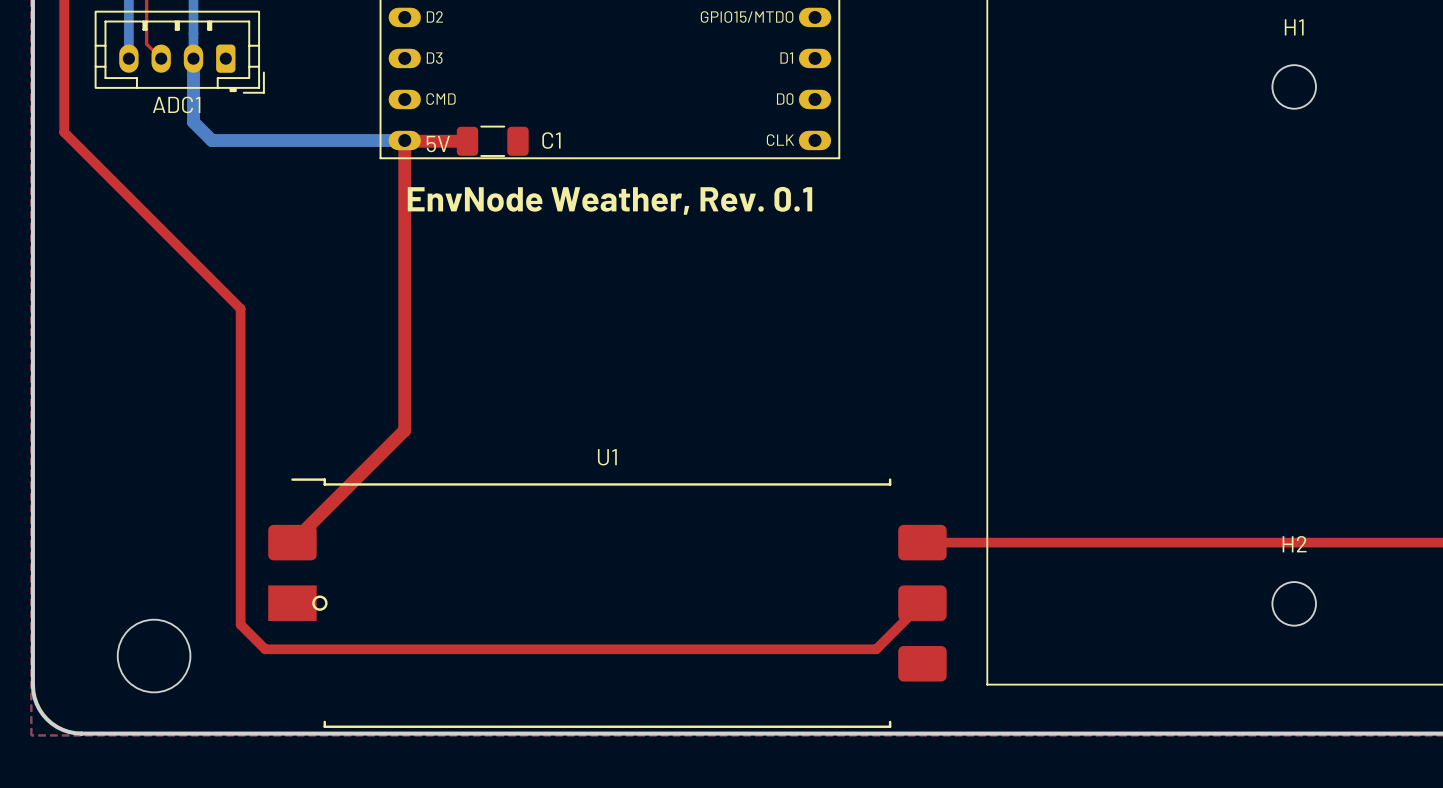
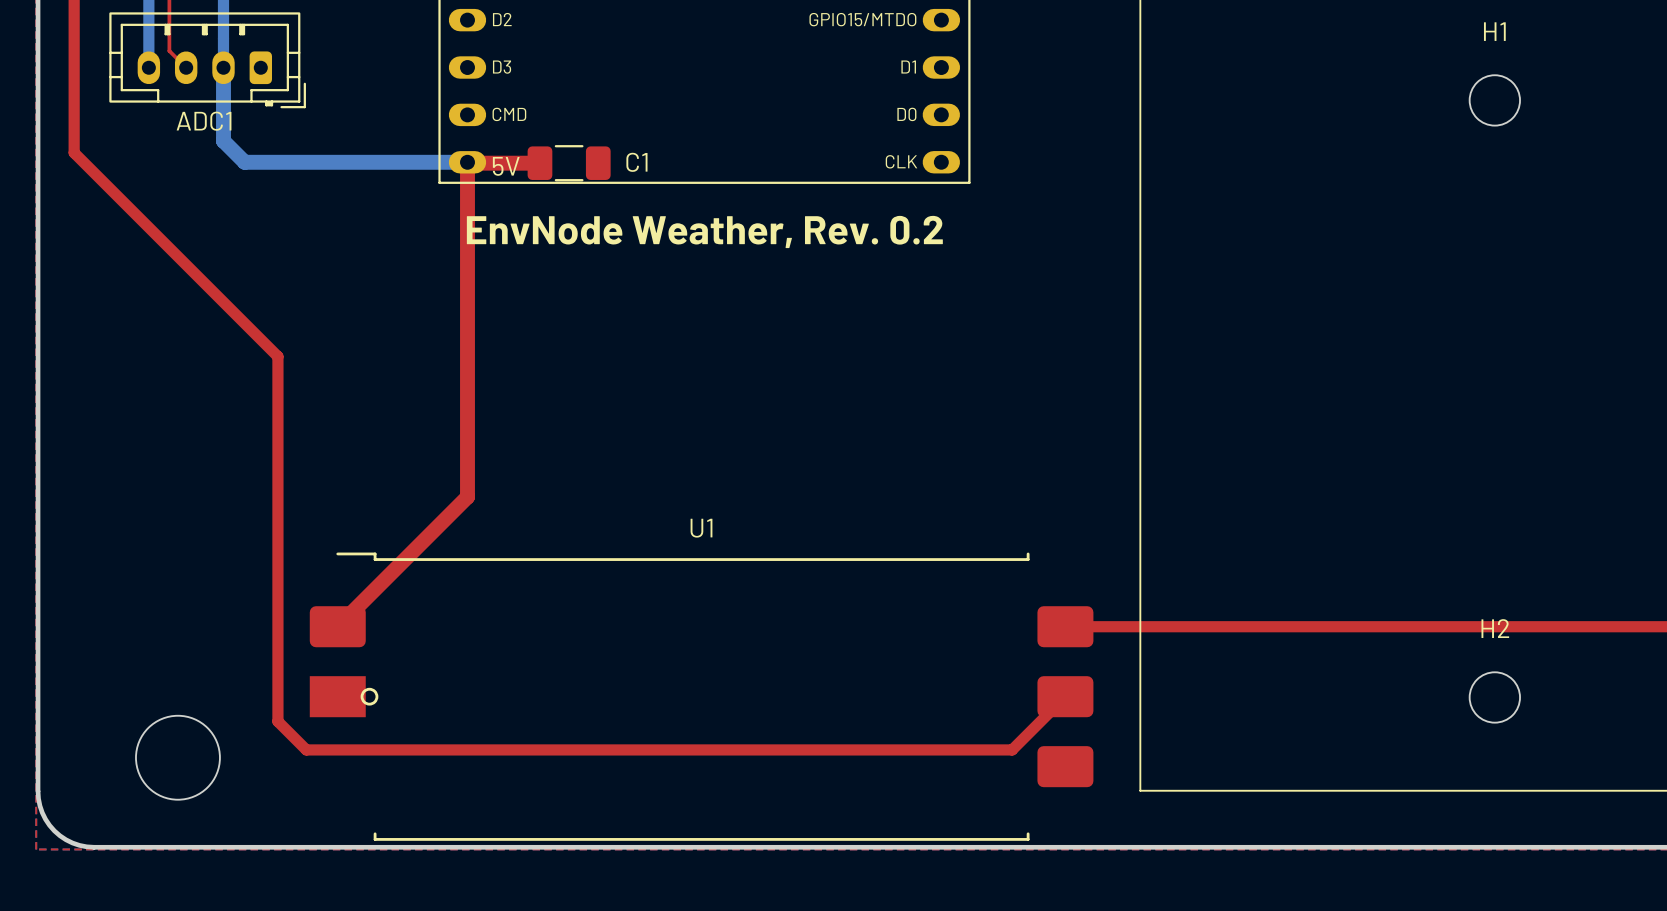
text: EnvNode Weather, Rev. 0.1 (609, 200) -> EnvNode Weather, Rev. 0.2 (704, 231)

